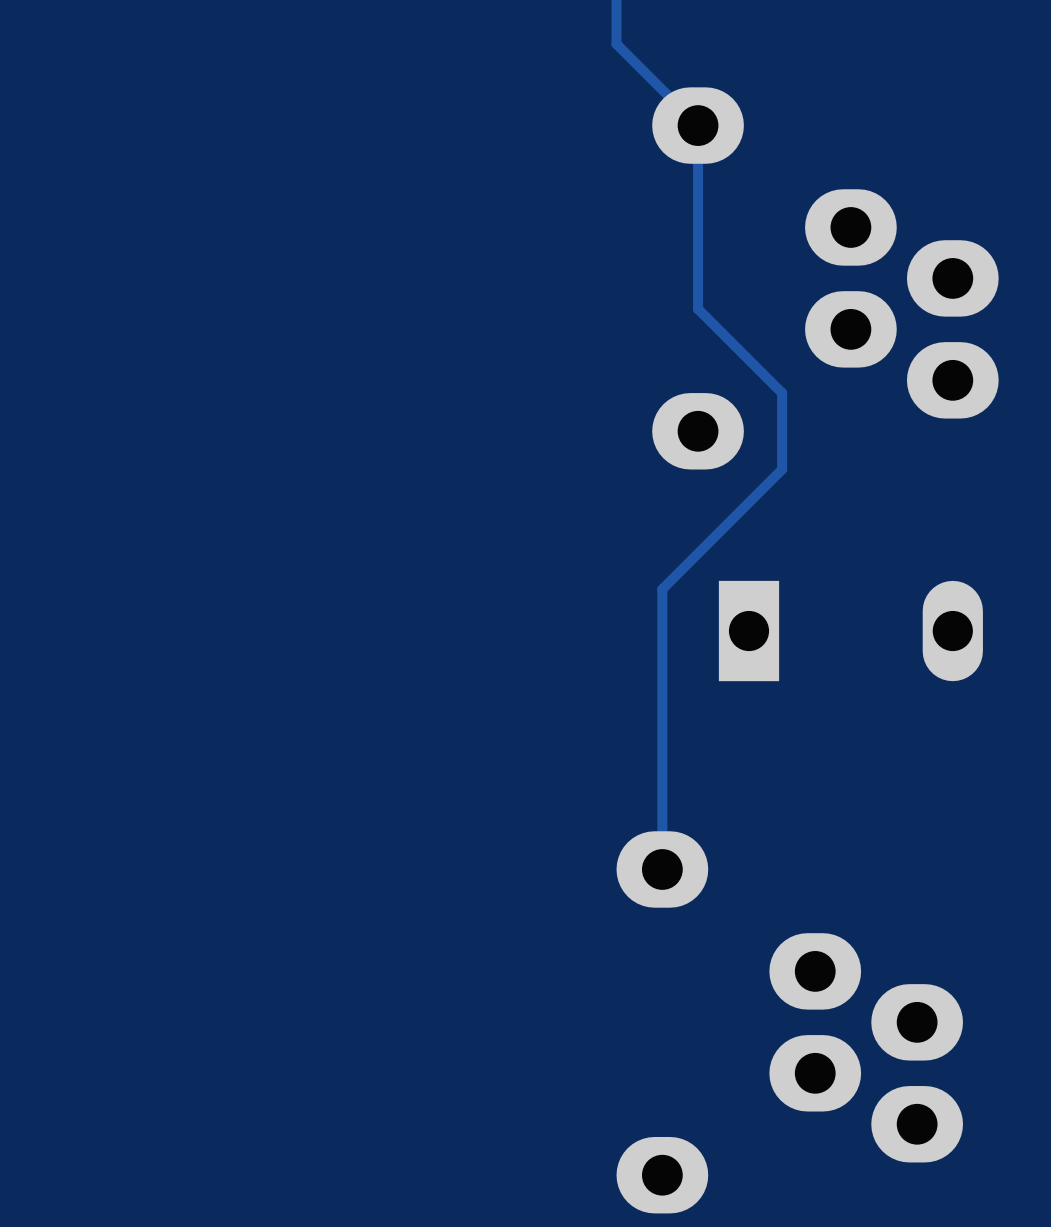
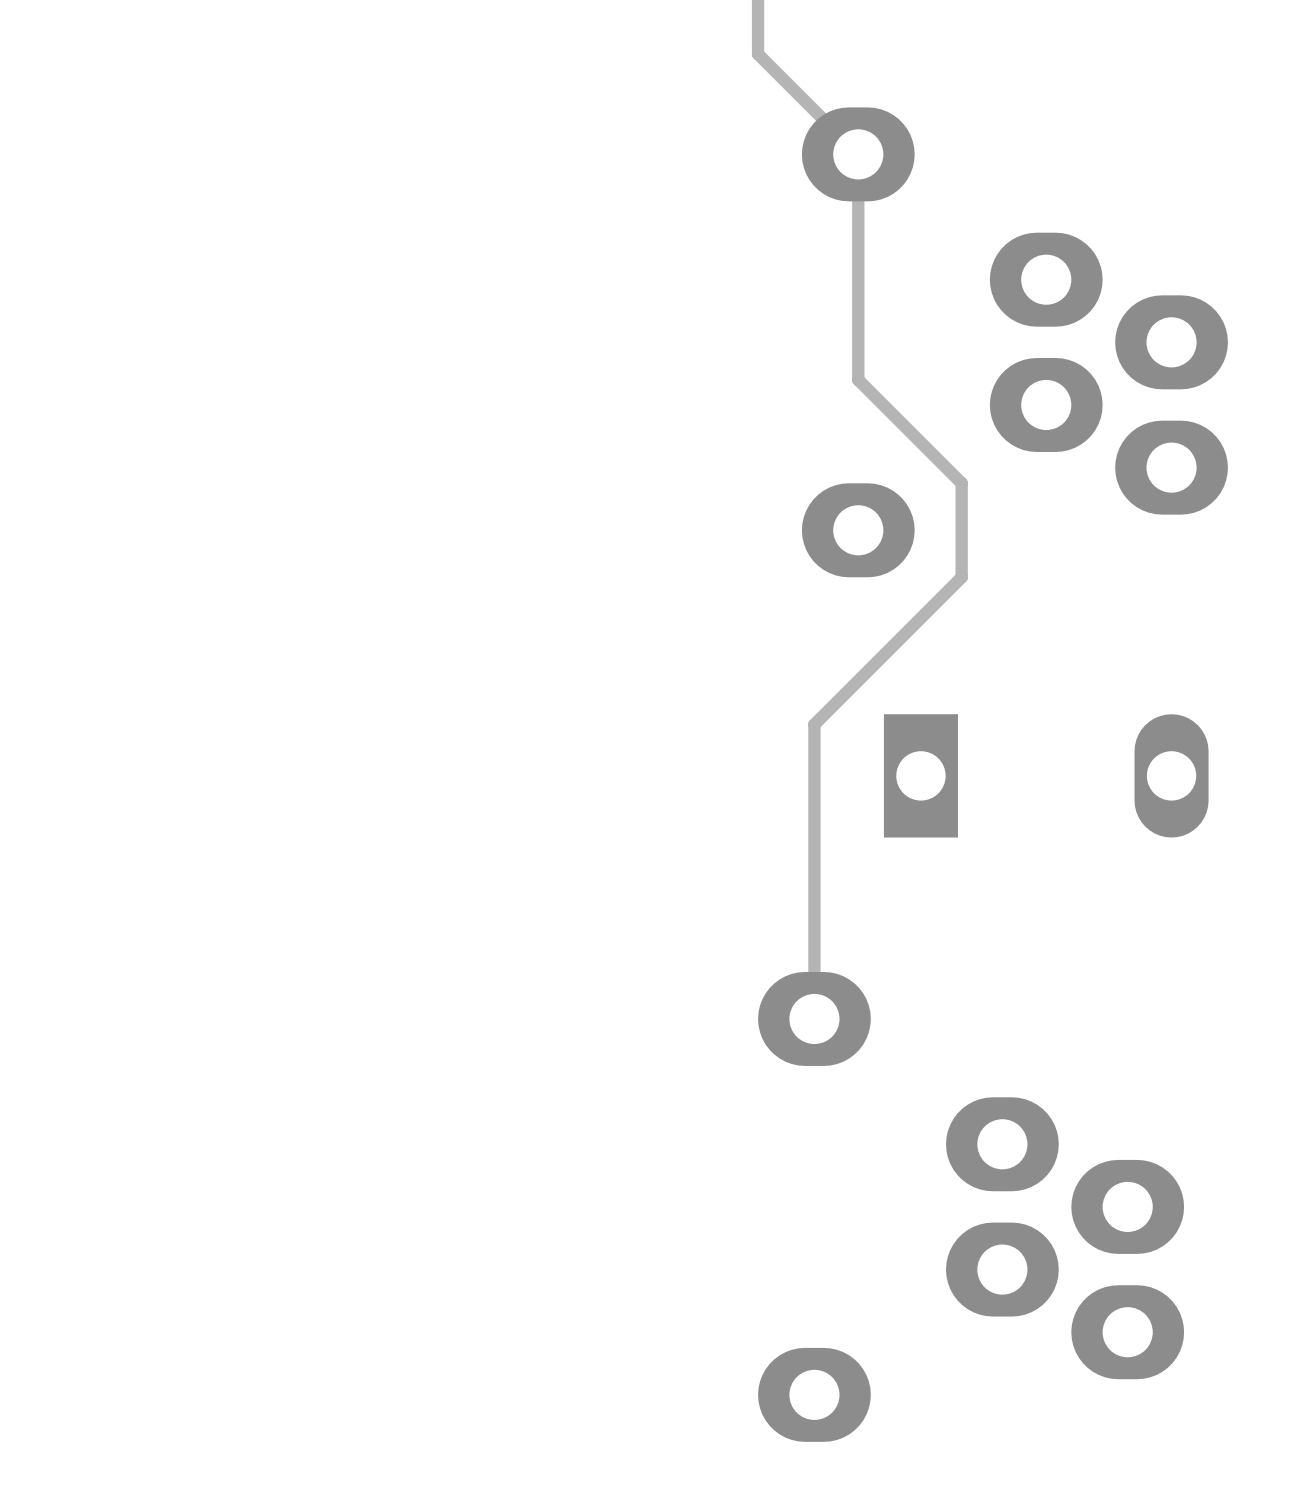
part position: (789, 1022) -> (971, 1206)

